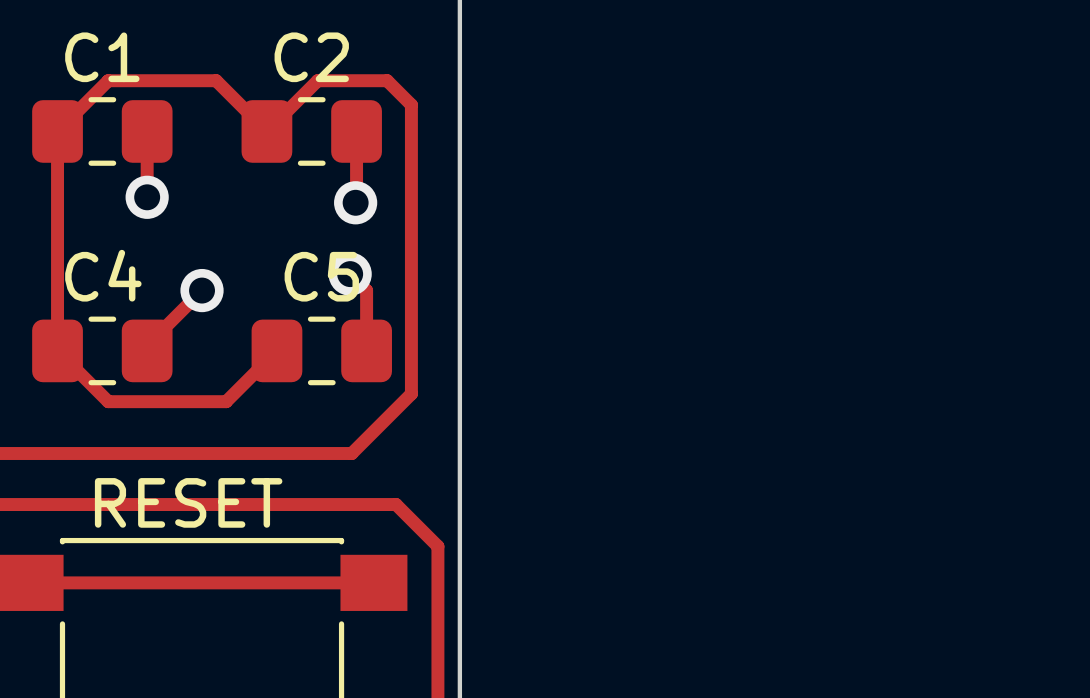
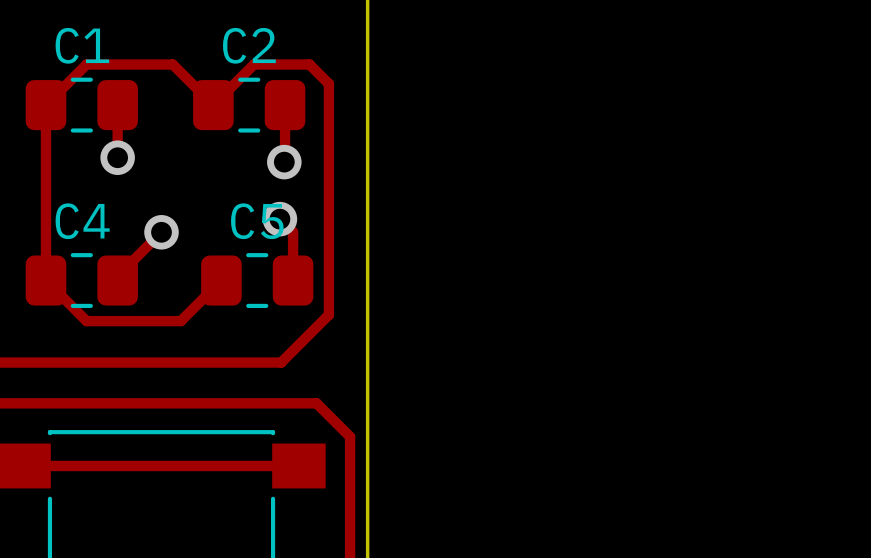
text: RESET (188, 502) -> none

